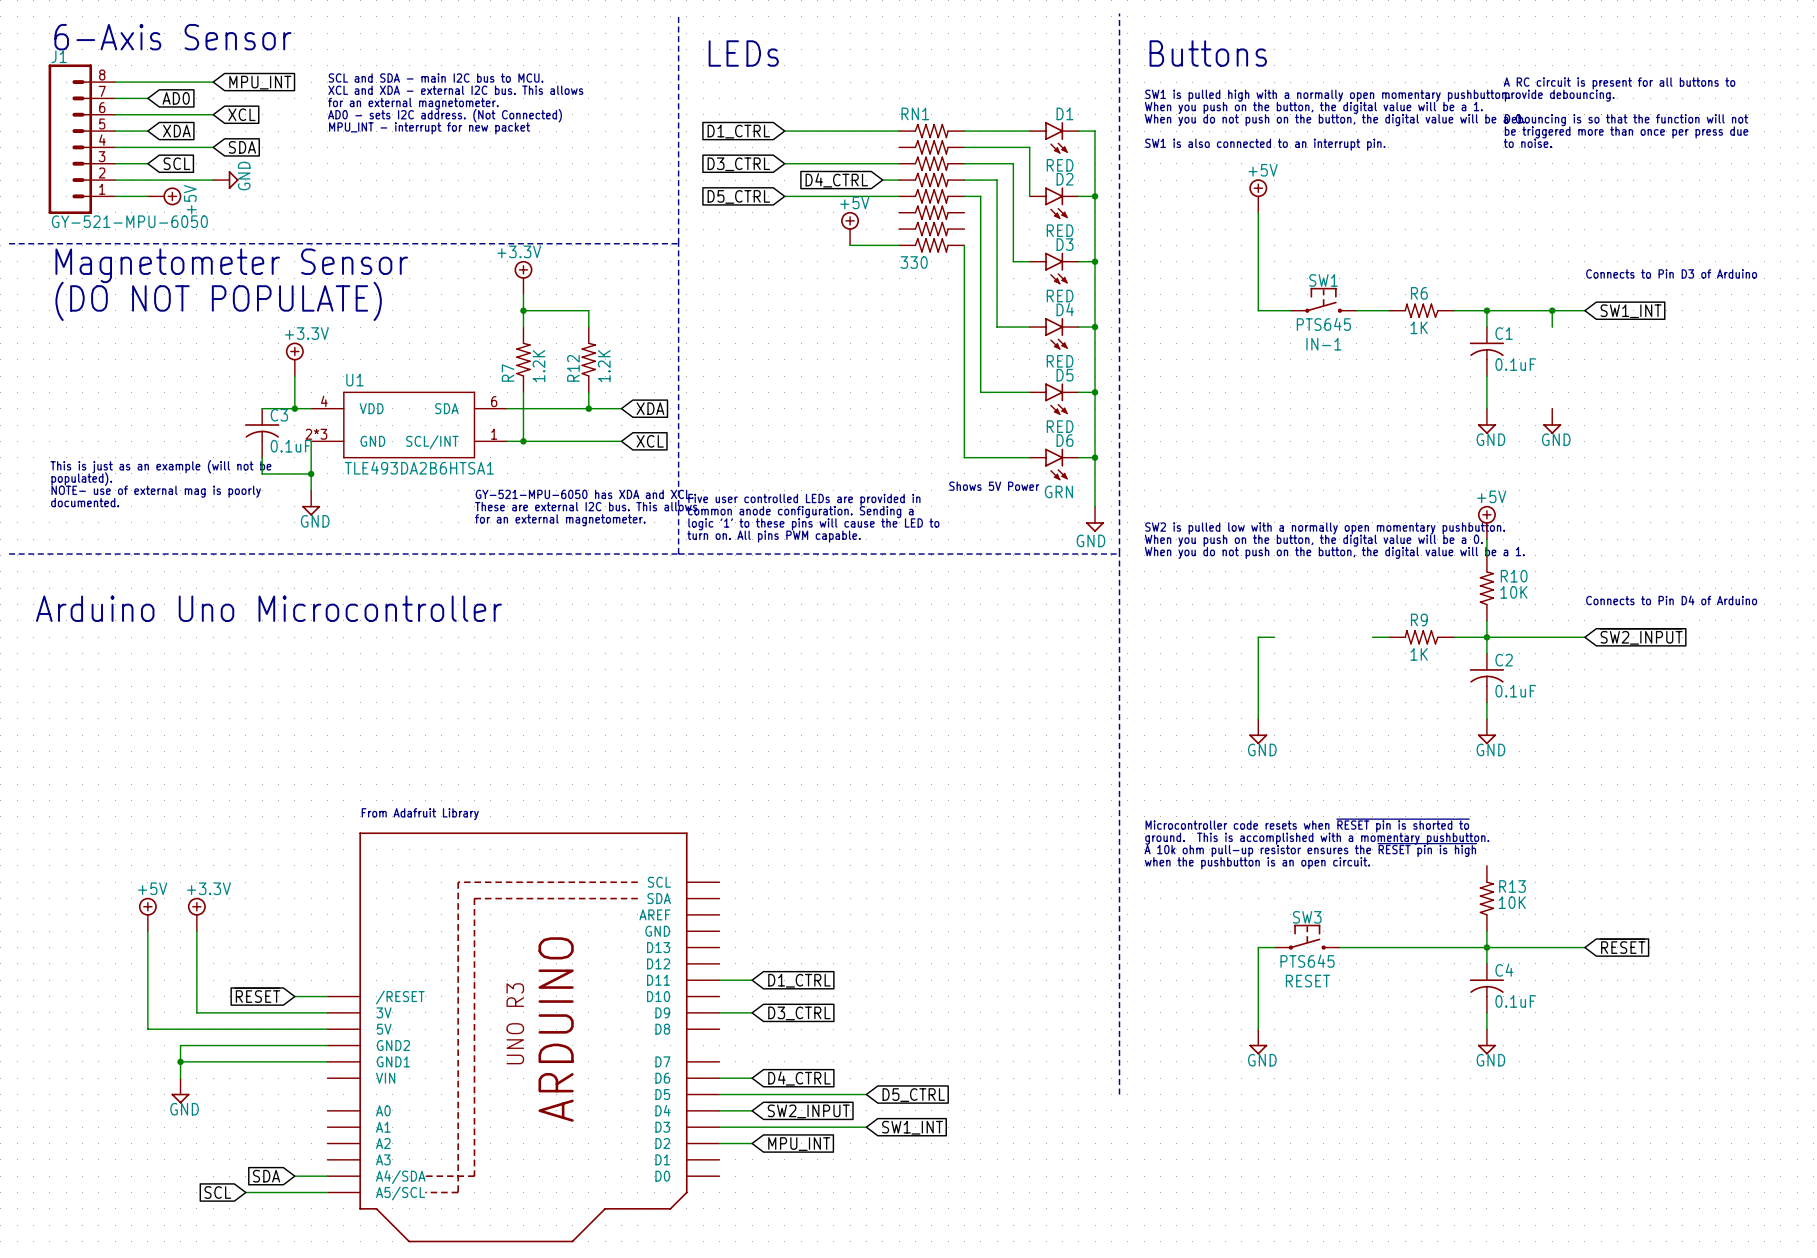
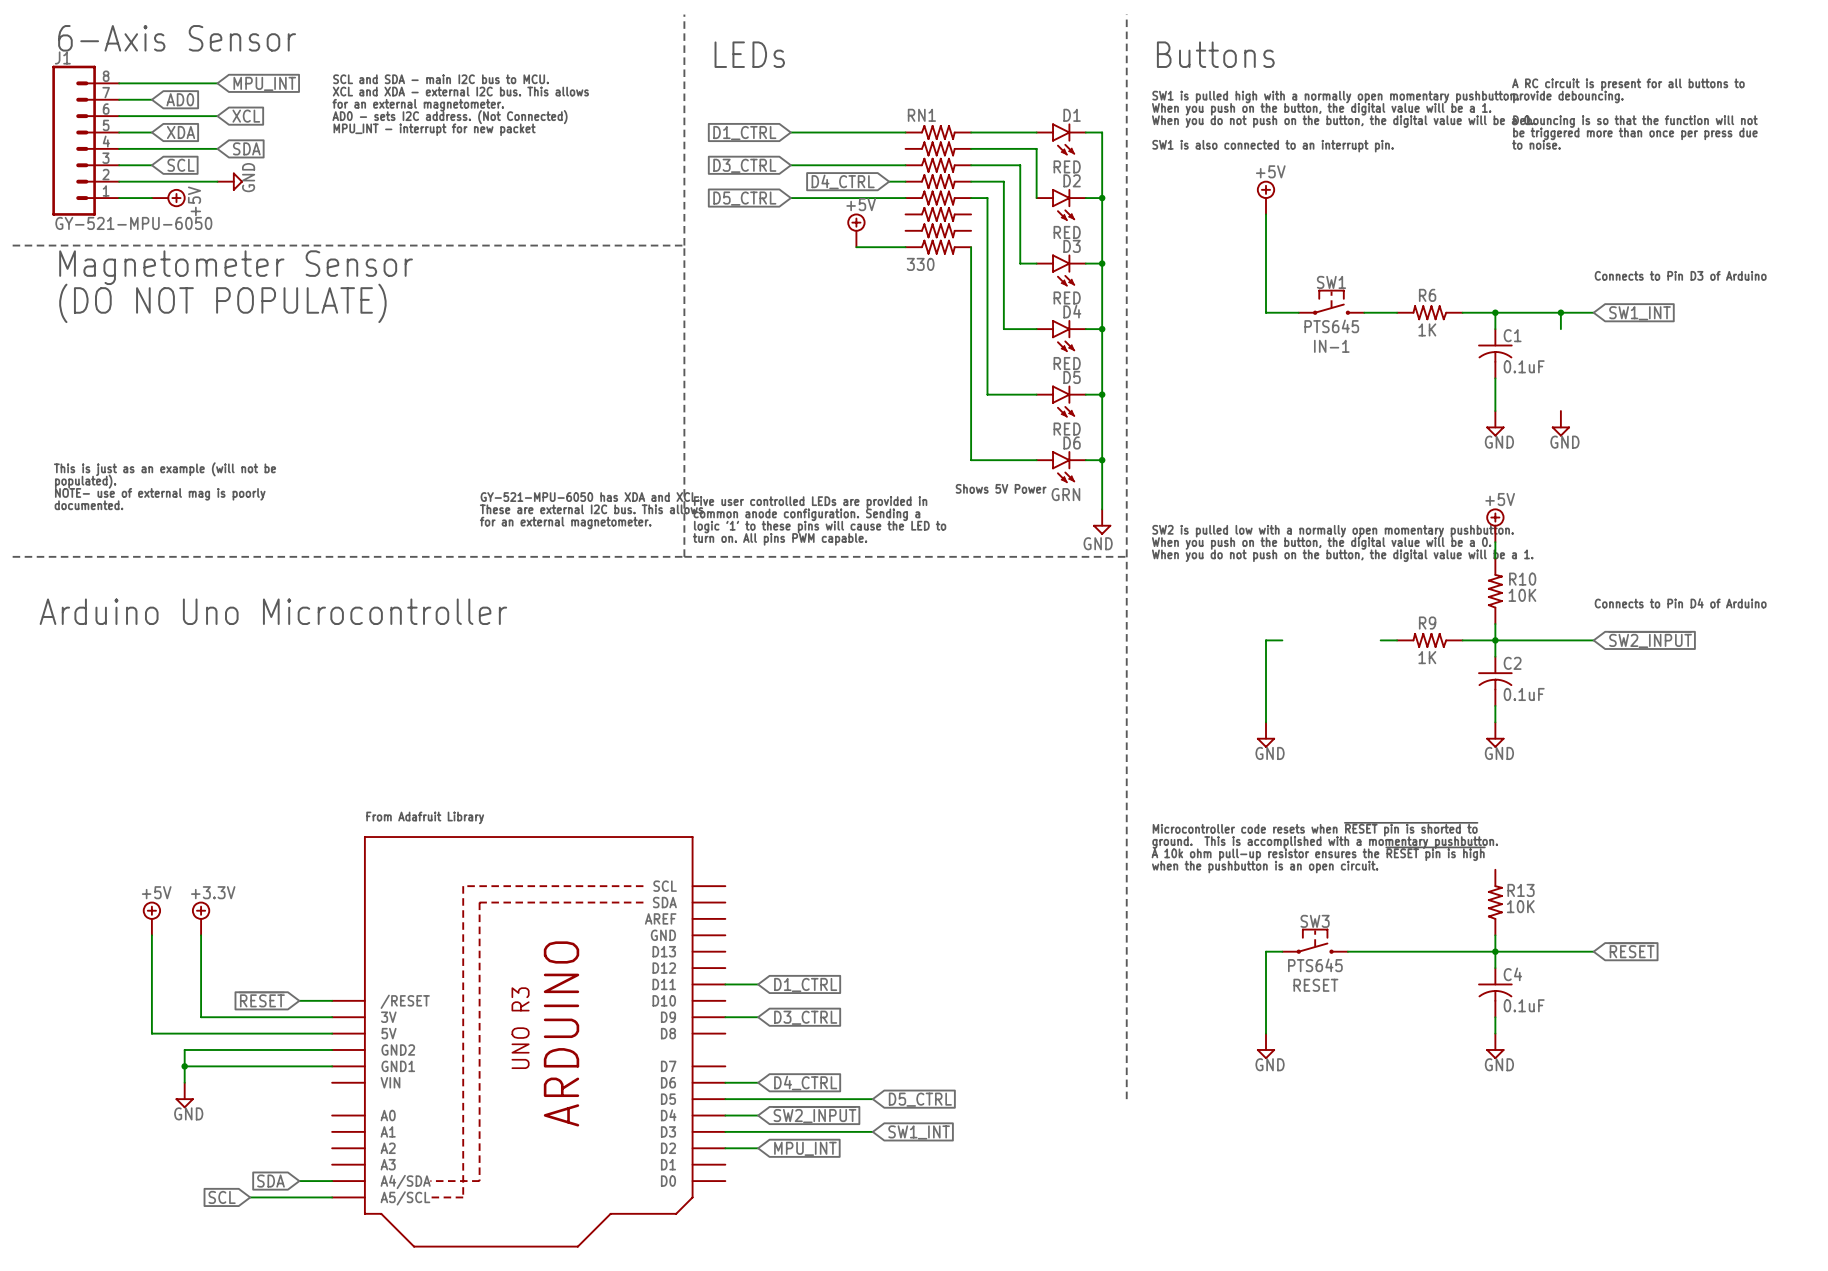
power symbol: +3.3V (523, 277) -> none
wire: (523, 294) (523, 327) -> none
wire: (523, 310) (588, 310) (588, 327) -> none
junction: (523, 310) -> none
power symbol: +3.3V (294, 359) -> none
R7: 1.2K (523, 359) -> none
R12: 1.2K (588, 359) -> none
wire: (294, 376) (294, 408) -> none
wire: (523, 392) (523, 441) -> none
wire: (588, 392) (588, 408) -> none
wire: (262, 408) (311, 408) -> none
junction: (294, 408) -> none
wire: (507, 408) (621, 408) -> none
junction: (588, 408) -> none
global label: XDA (650, 408) -> none
U1: TLE493DA2B6HTSA1 (409, 425) -> none
C3: 0.1uF (262, 433) -> none
wire: (311, 441) (311, 490) -> none
wire: (507, 441) (621, 441) -> none
junction: (523, 441) -> none
global label: XCL (650, 441) -> none
wire: (262, 457) (262, 473) (311, 473) -> none
junction: (311, 473) -> none
power symbol: GND (311, 502) -> none

